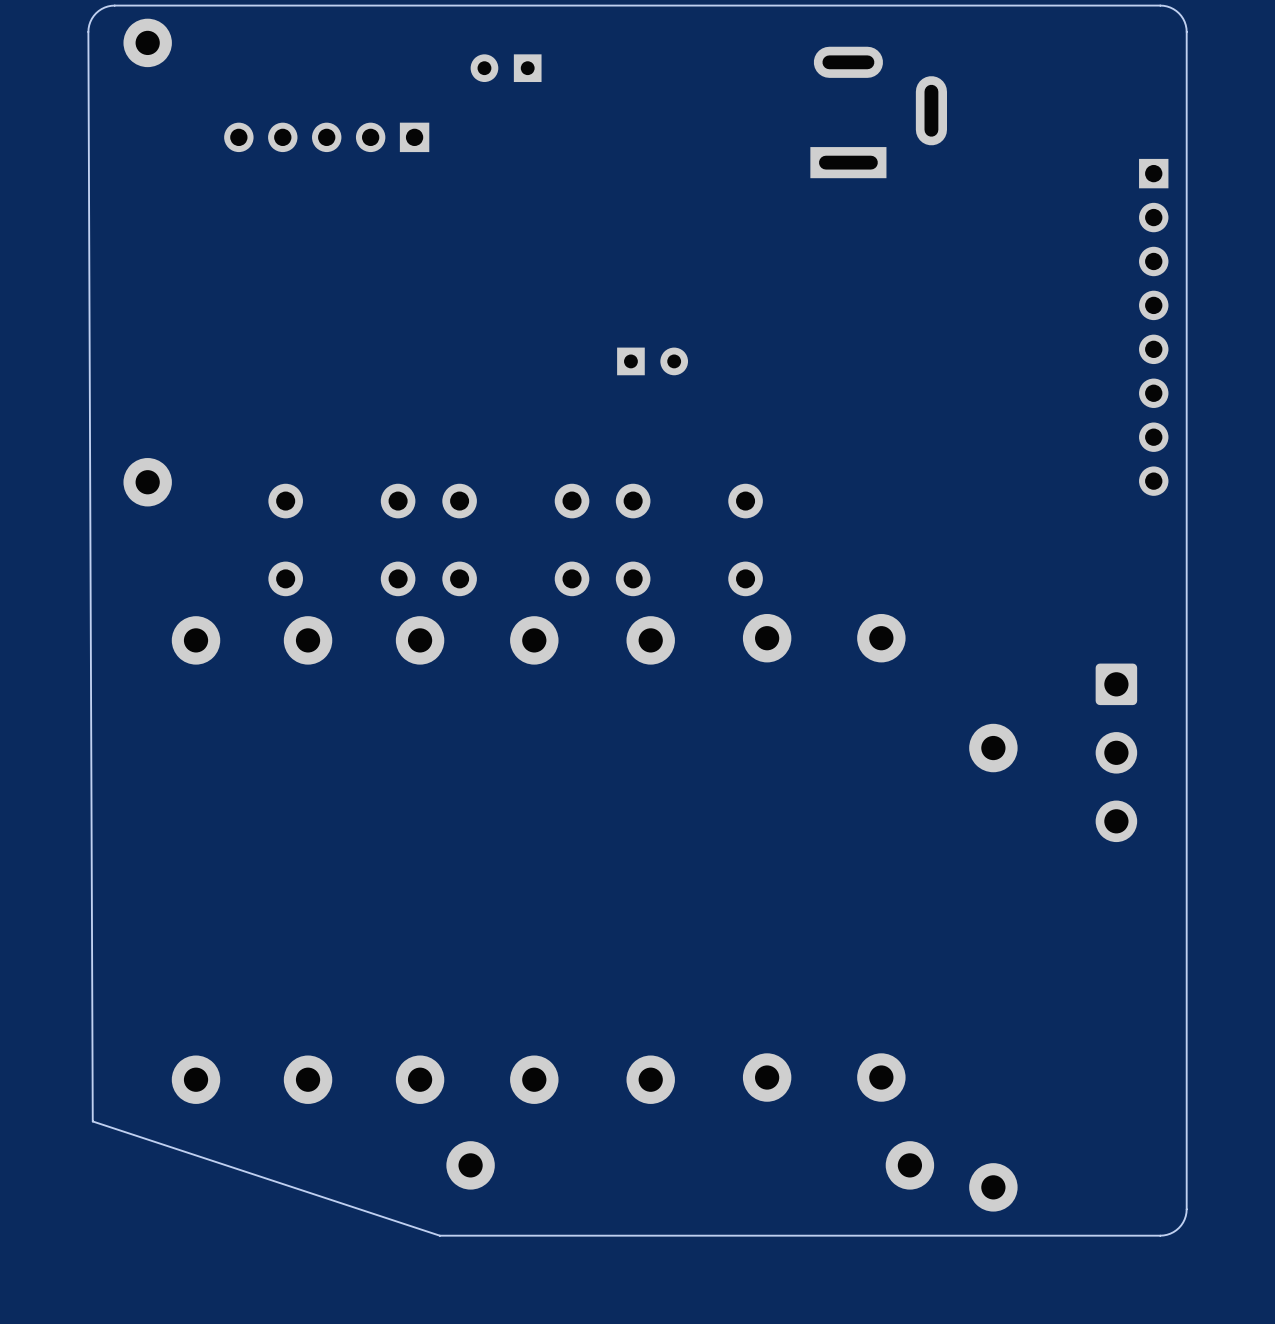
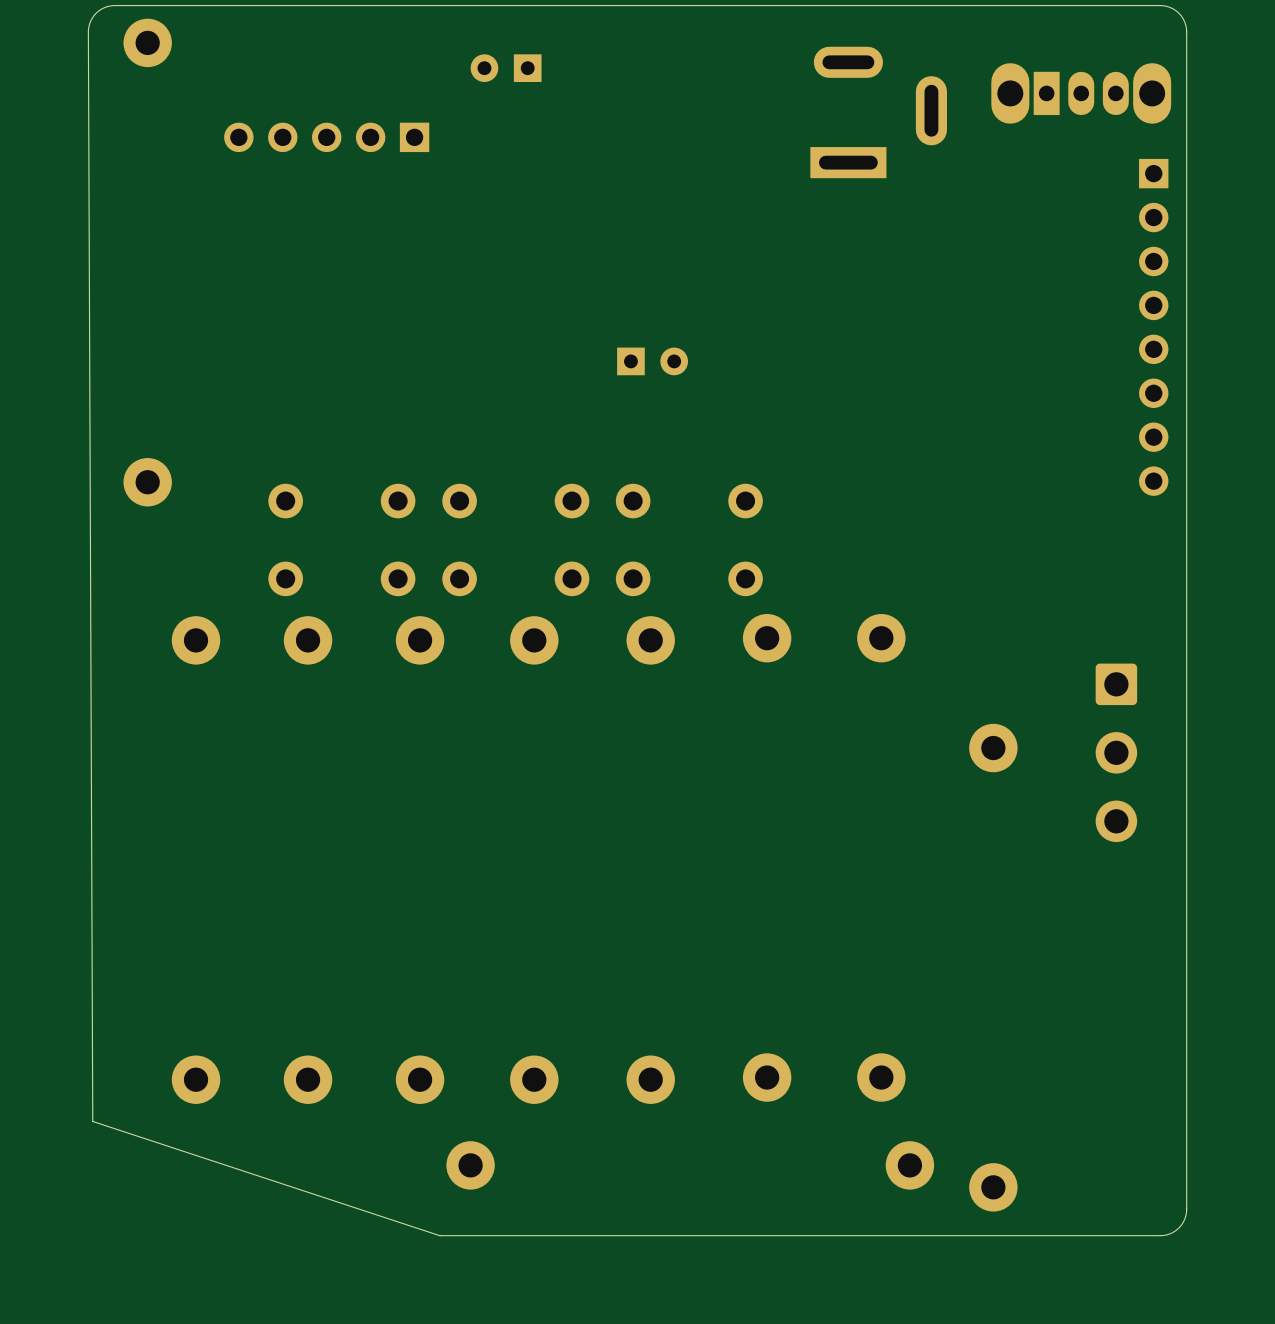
part: none -> (1081, 93)

